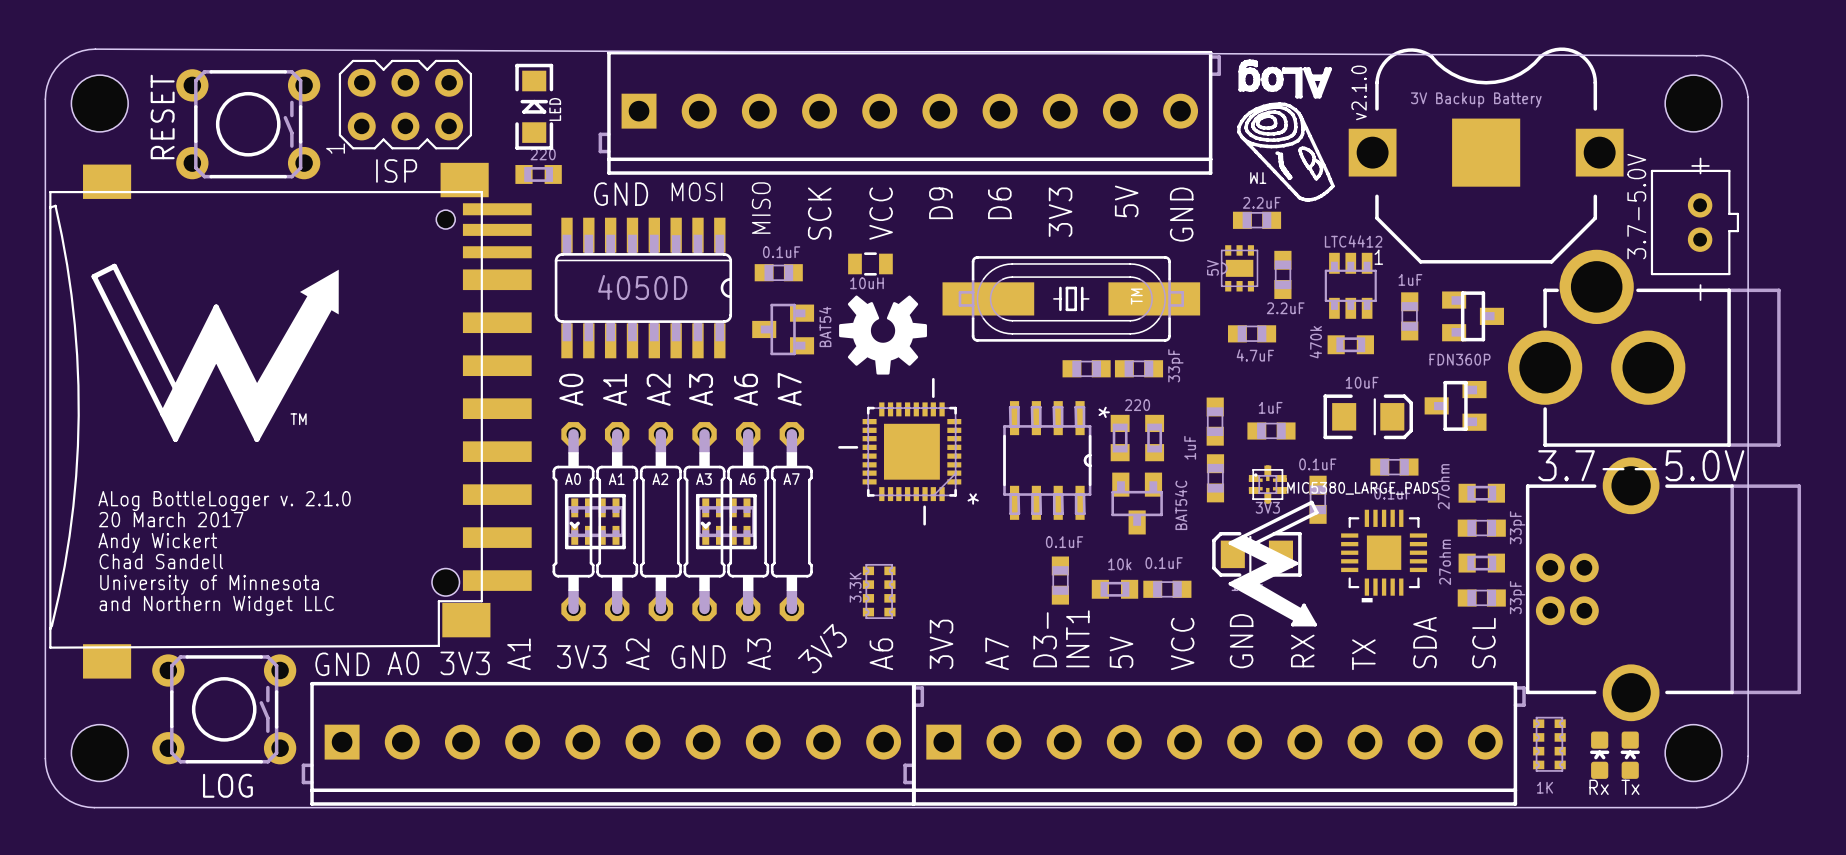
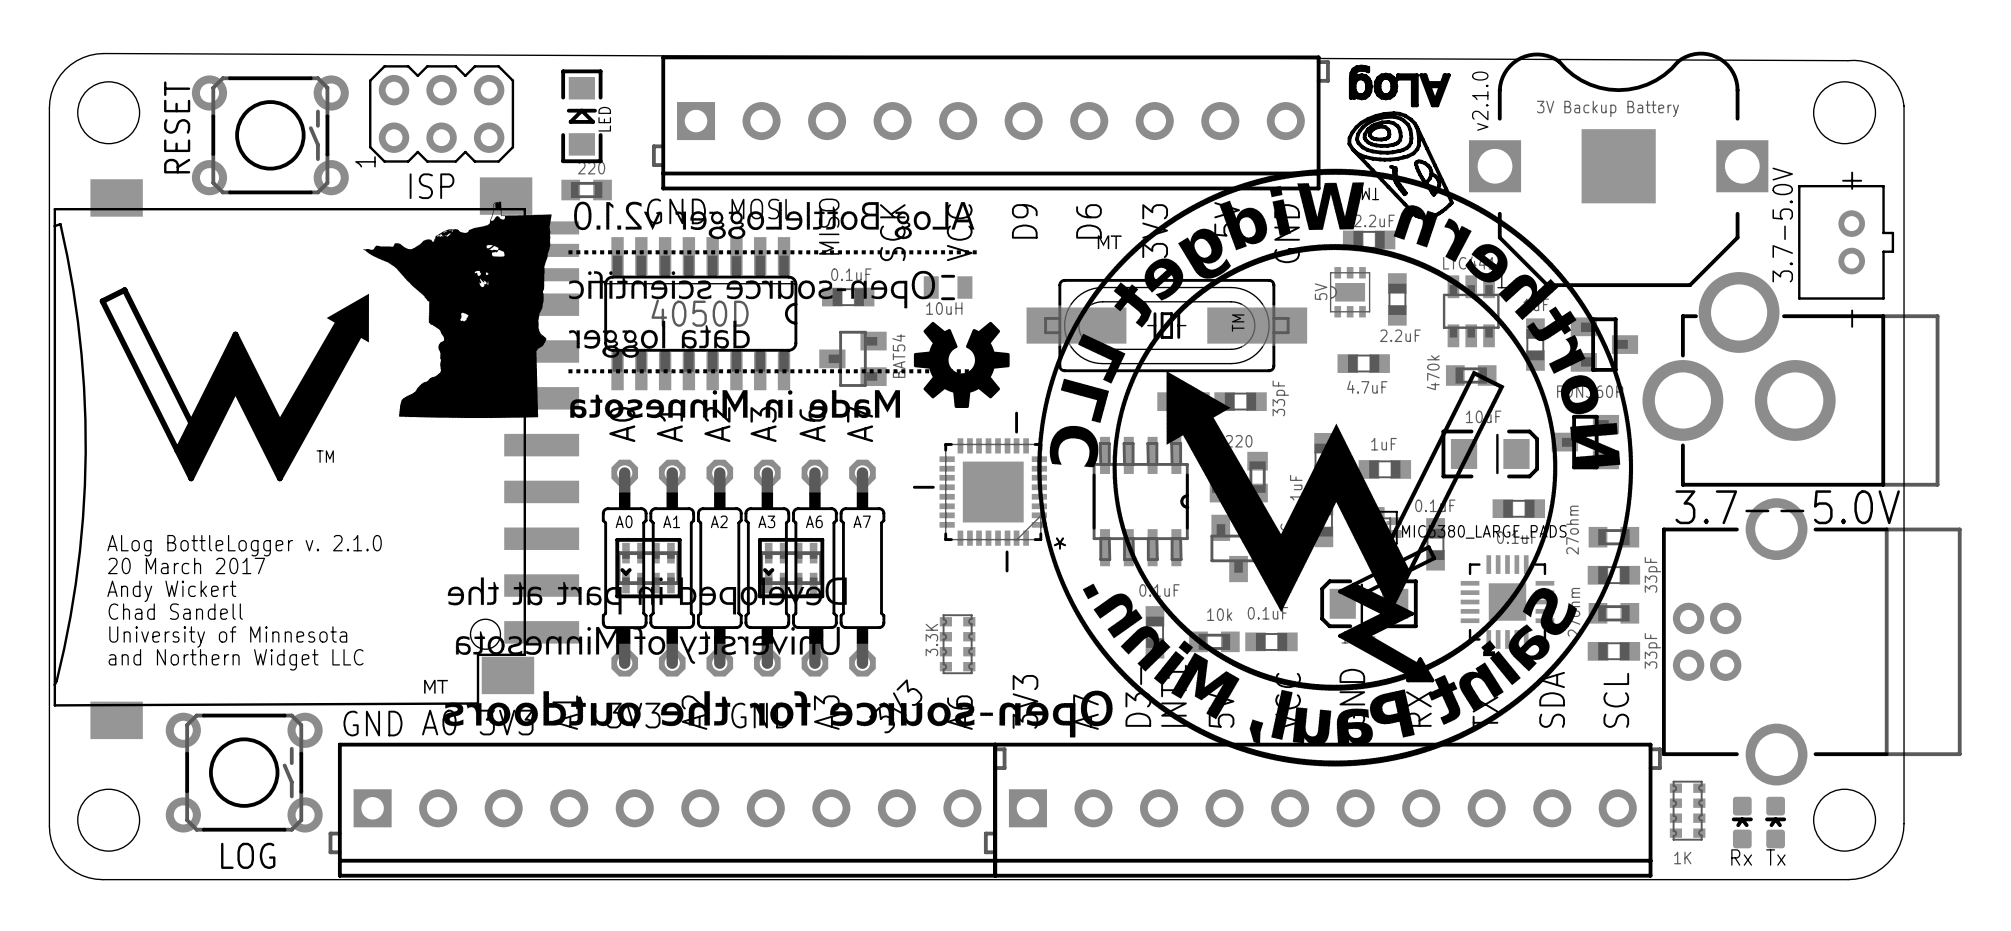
drawing: none -> [363, 168, 1634, 767]

